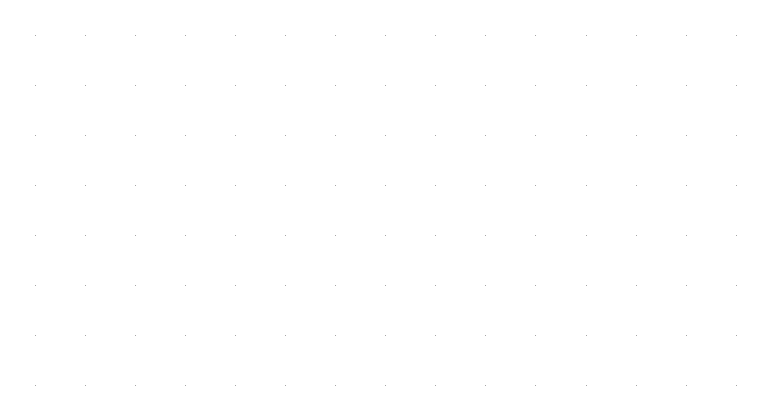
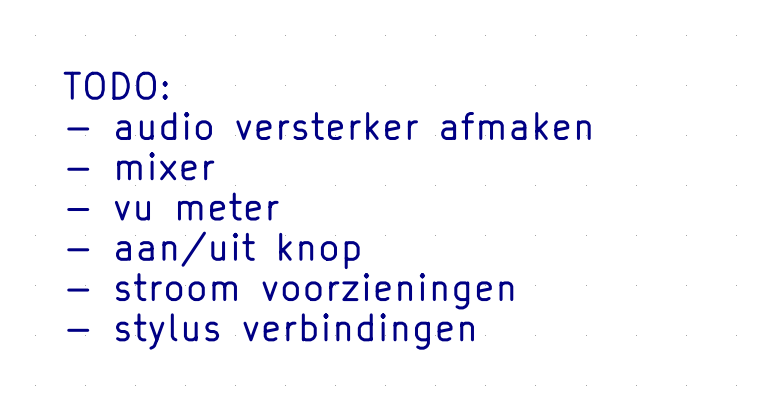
text: none -> TODO: (115, 85)
text: none -> - audio versterker afmaken (328, 126)
text: none -> - mixer (140, 166)
text: none -> - vu meter (172, 206)
text: none -> - aan/uit knop (213, 250)
text: none -> - stroom voorzieningen (290, 291)
text: none -> - stylus verbindingen (270, 331)

